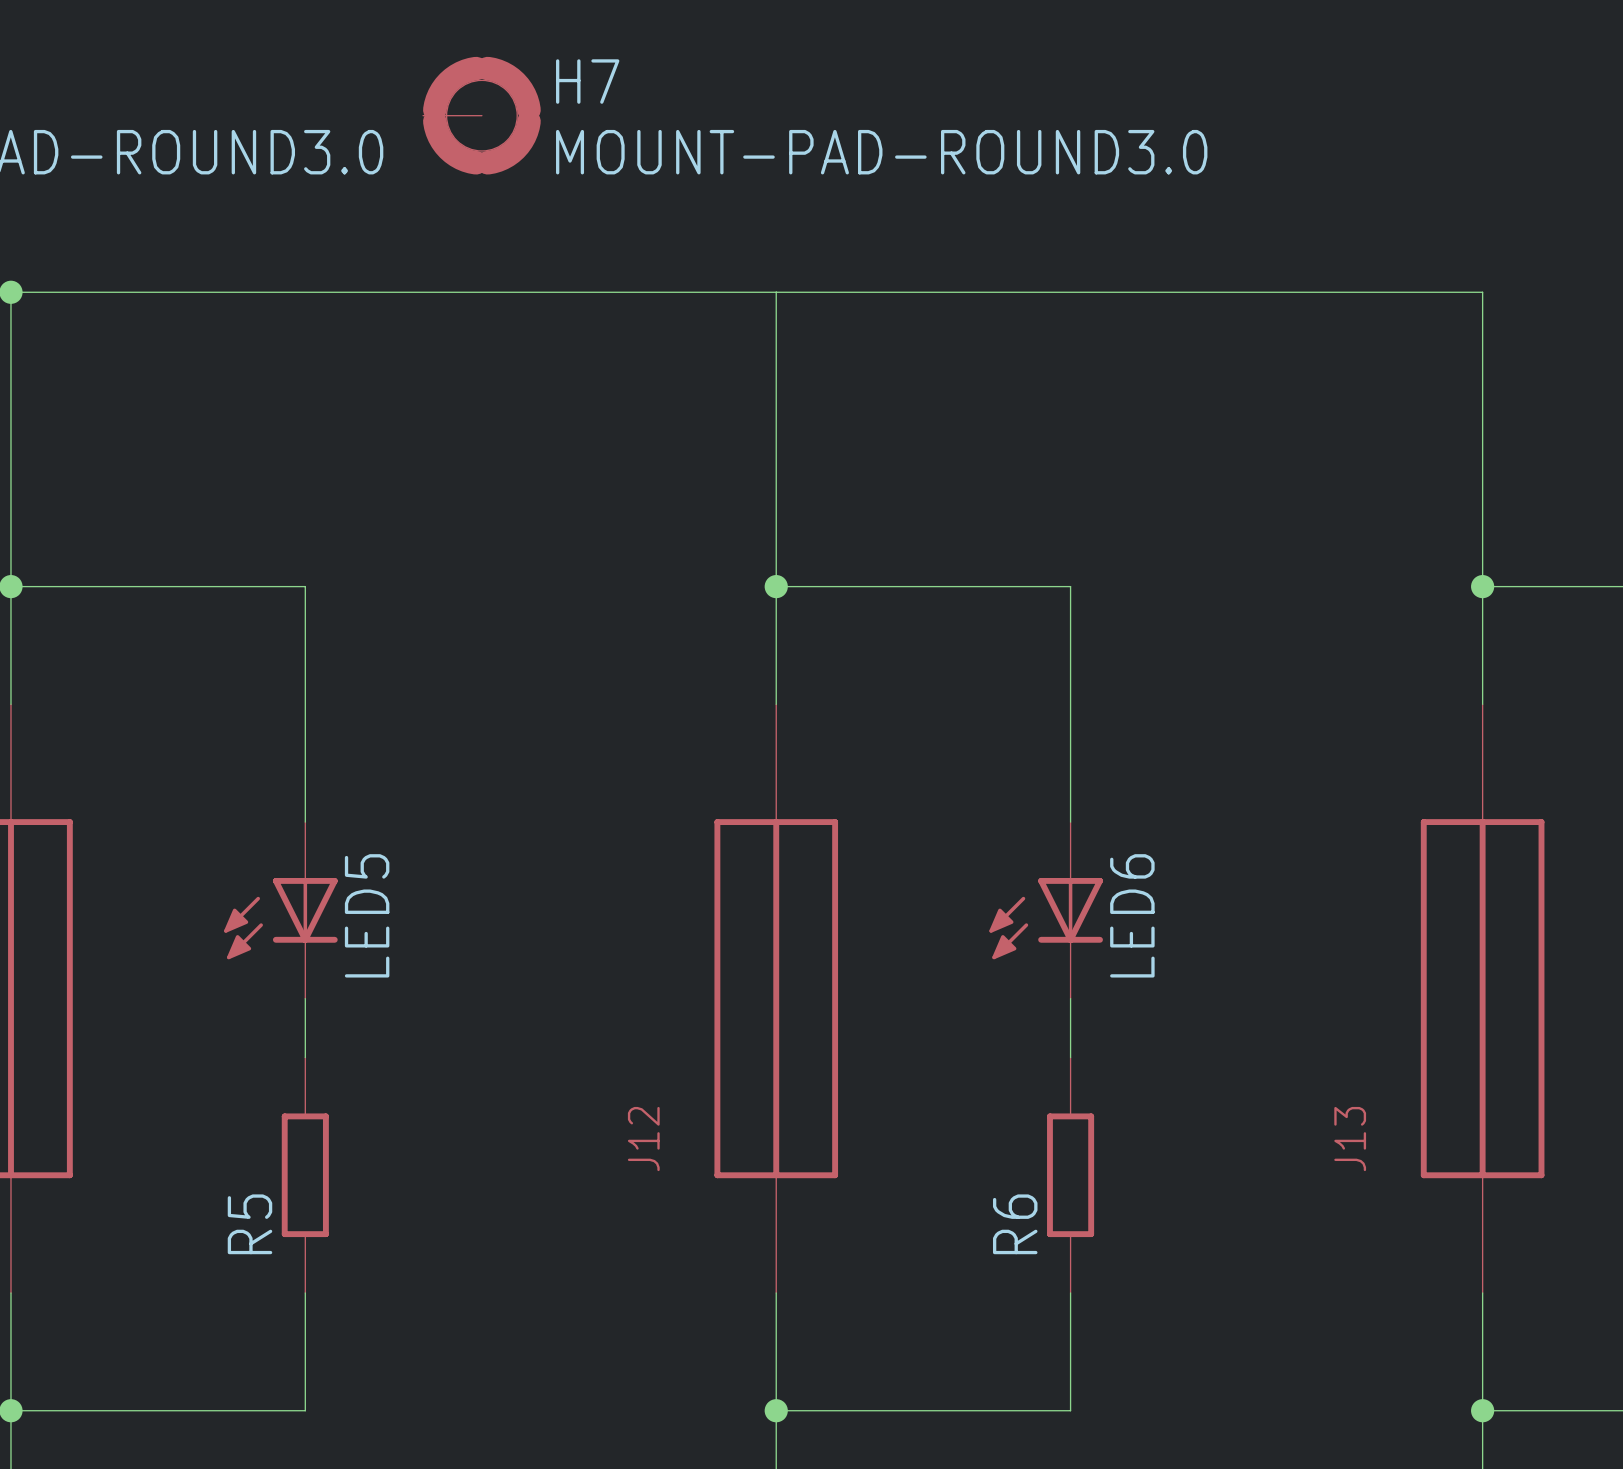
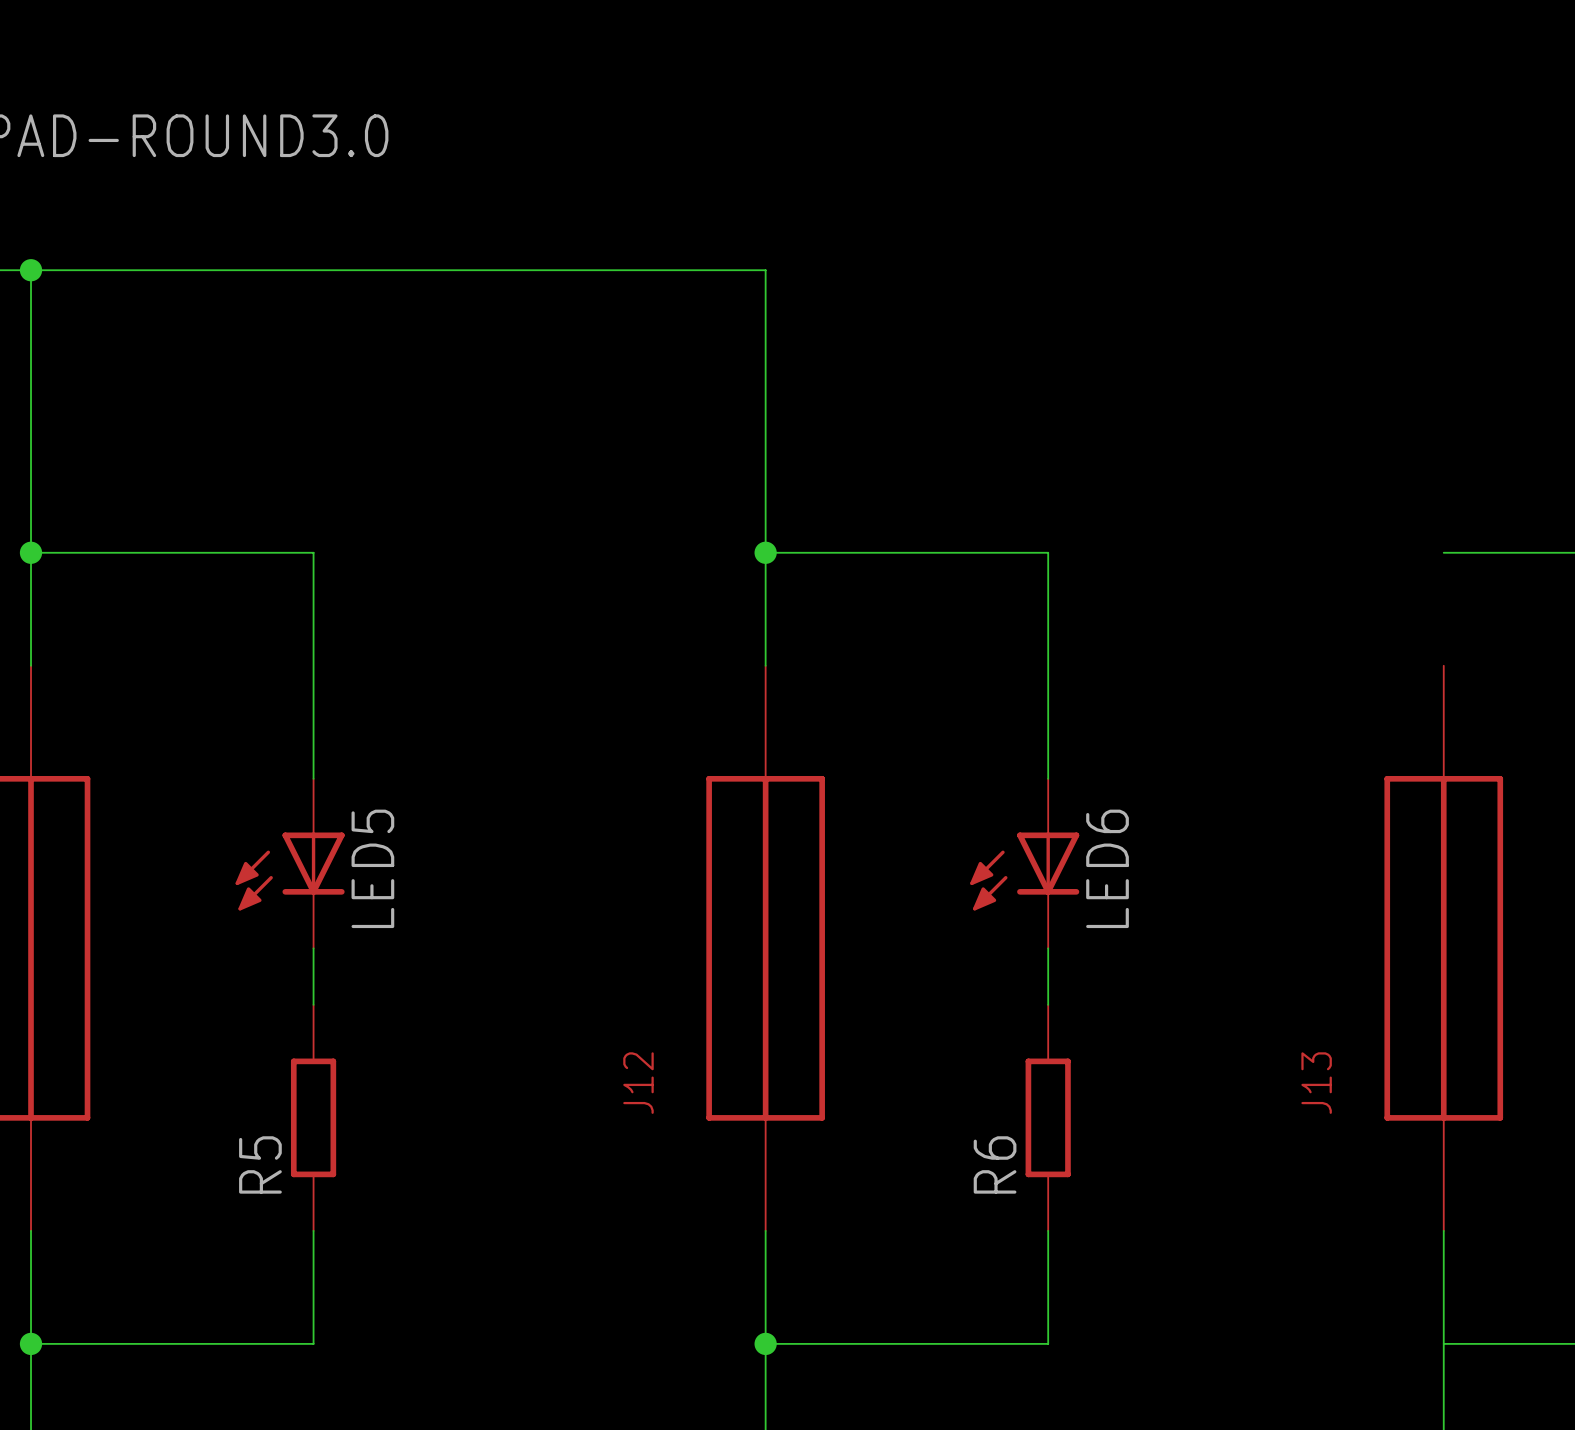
H7: MOUNT-PAD-ROUND3.0 (481, 115) -> none
wire: (776, 292) (1482, 292) (1482, 704) -> none
junction: (1482, 586) -> none
junction: (1482, 1410) -> none

